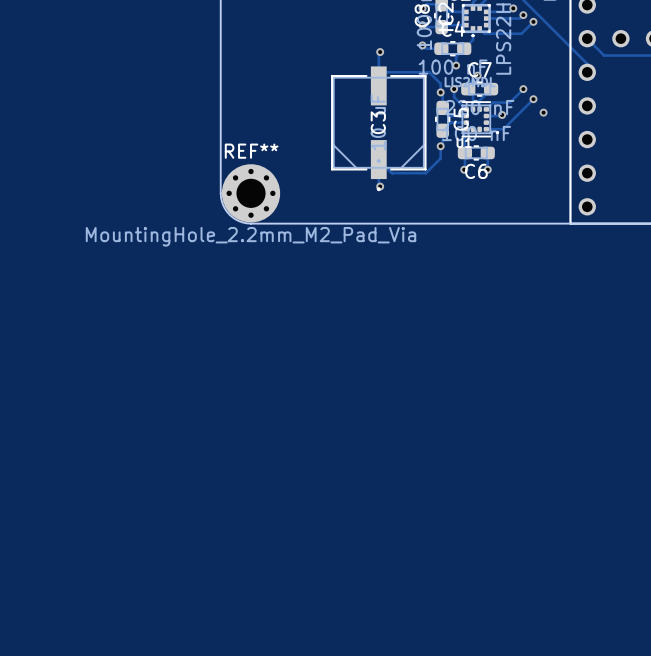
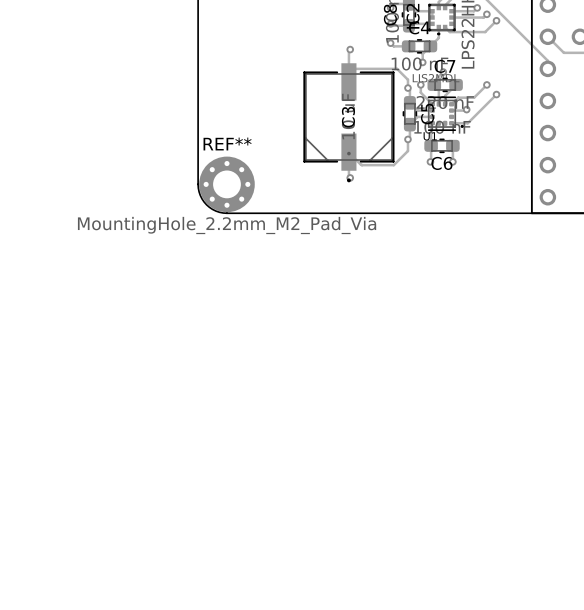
via: (543, 112) -> none

